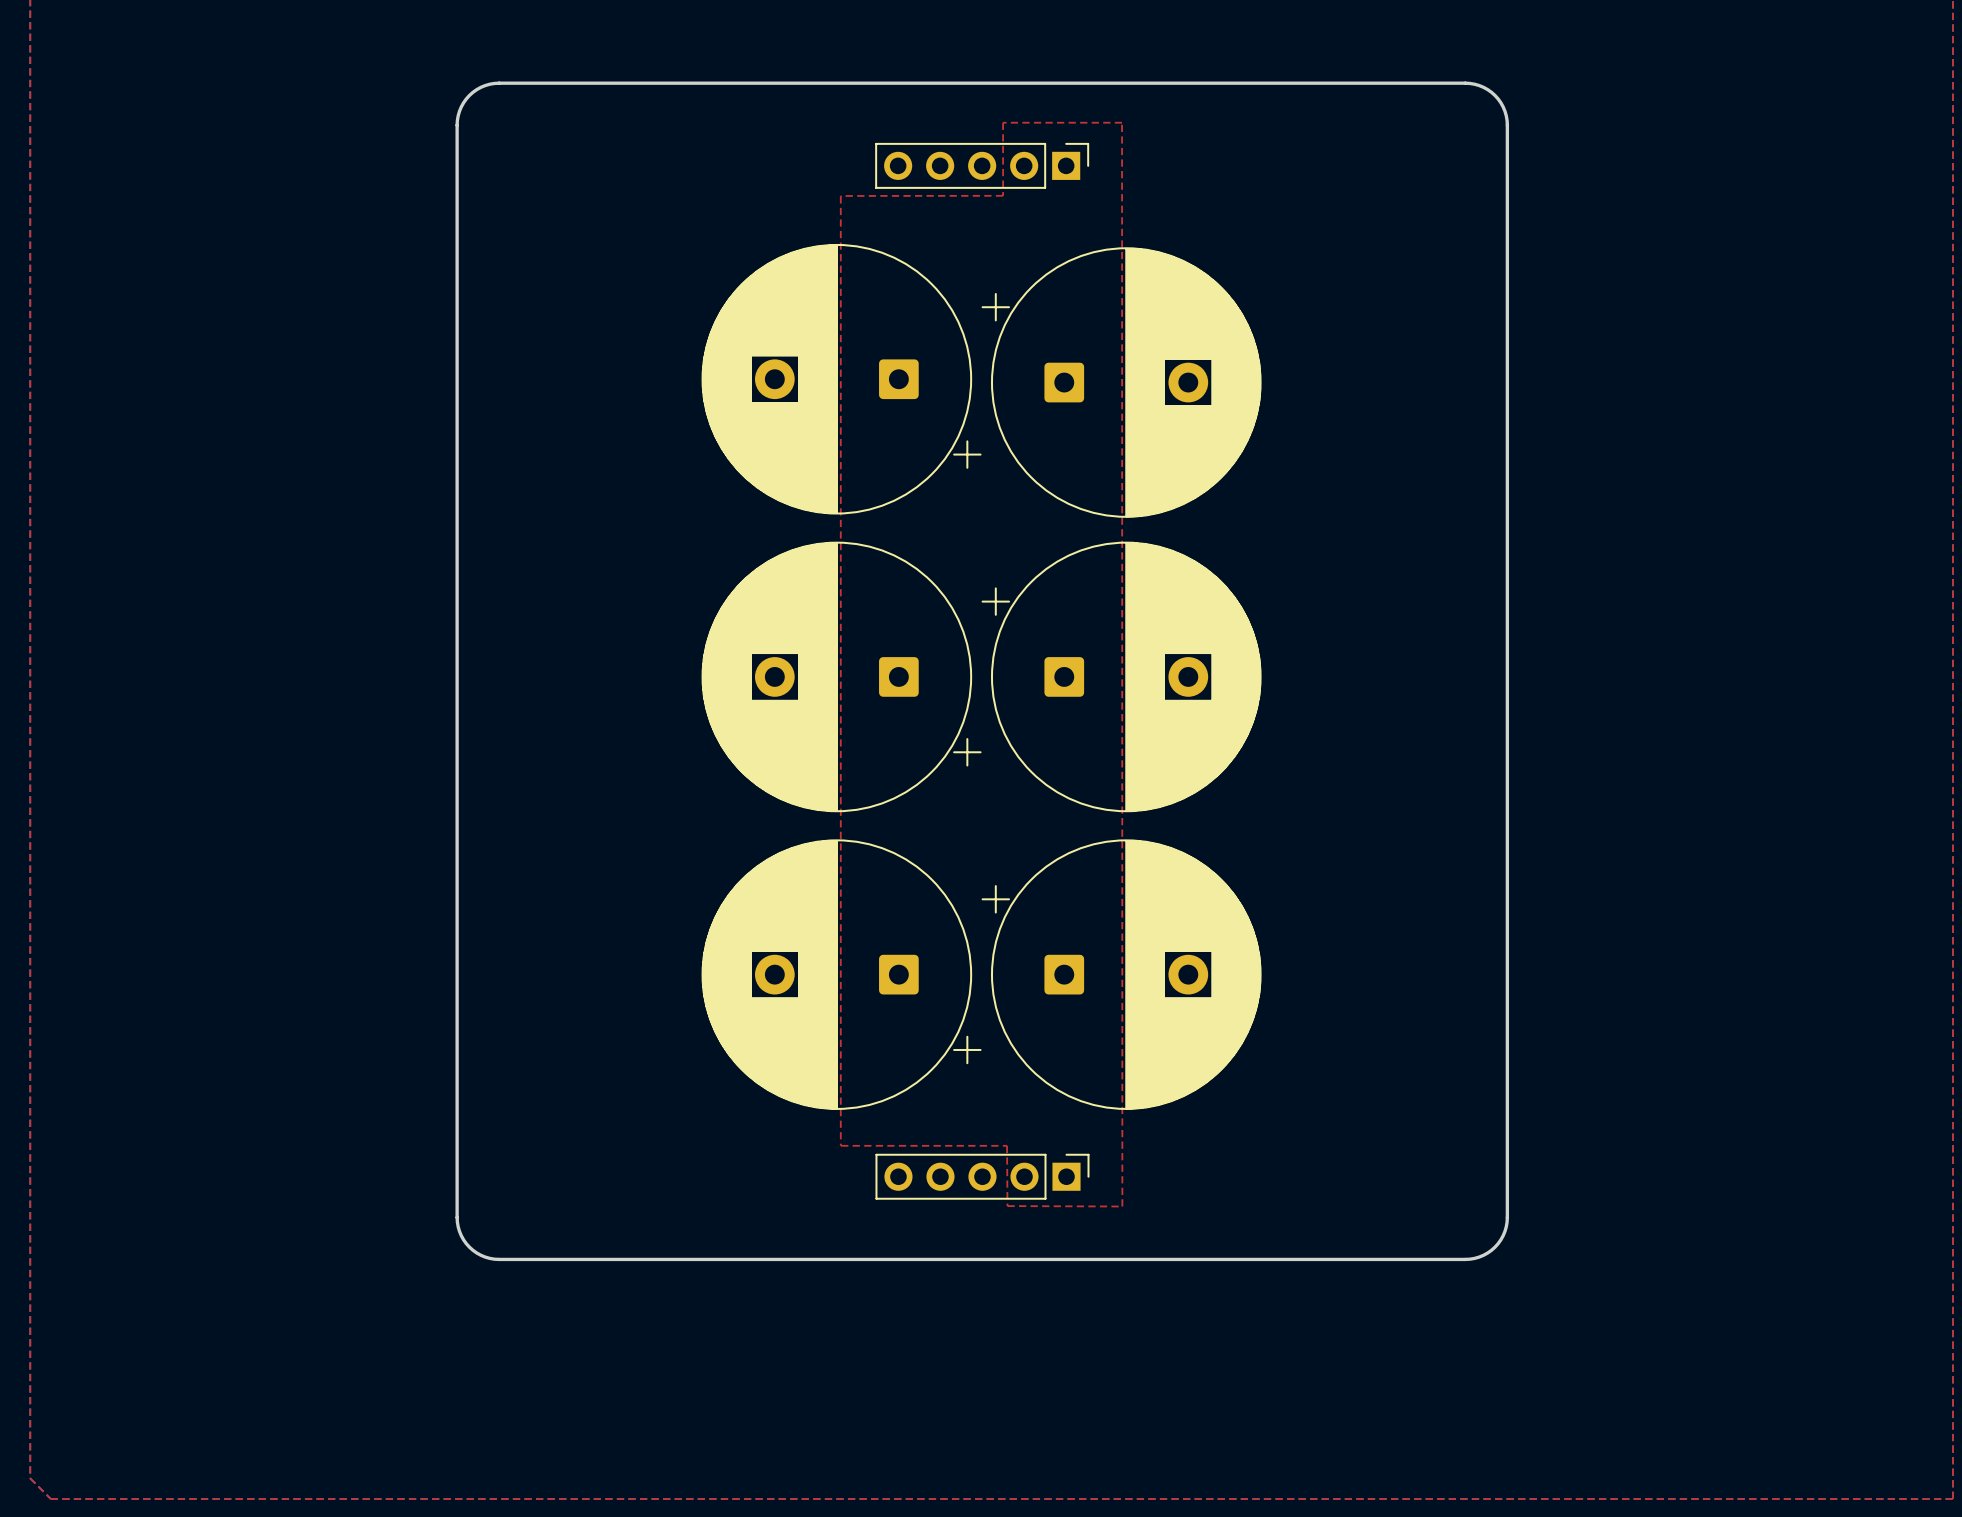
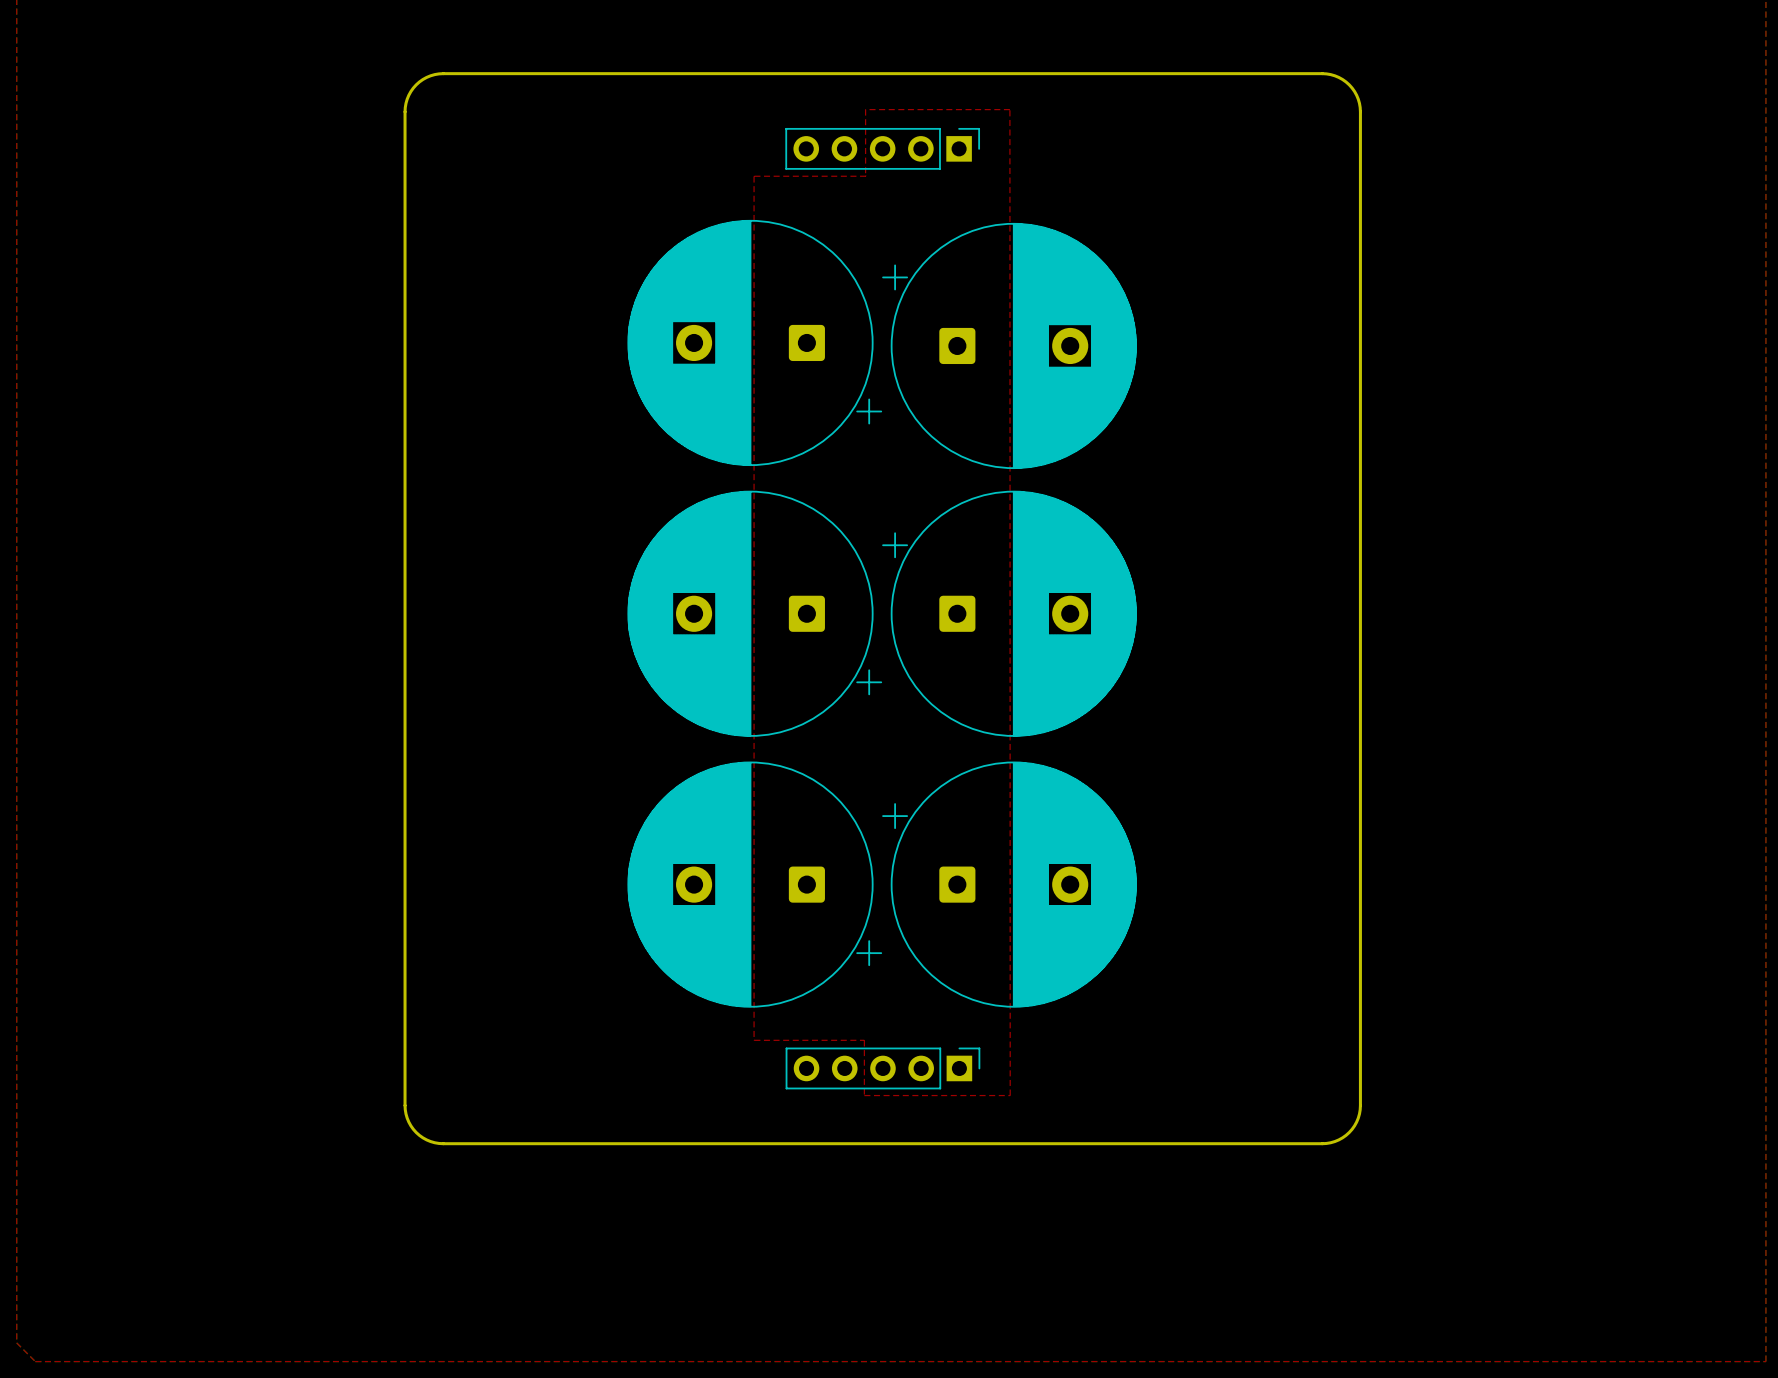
top zone outline: (1003, 122) (1003, 195) (841, 195) -> (901, 109) (865, 109) (866, 176) (754, 176)
top zone outline: (961, 1145) (1007, 1145) (1007, 1206) (1122, 1206) -> (864, 1040) (864, 1095) (1010, 1095)

